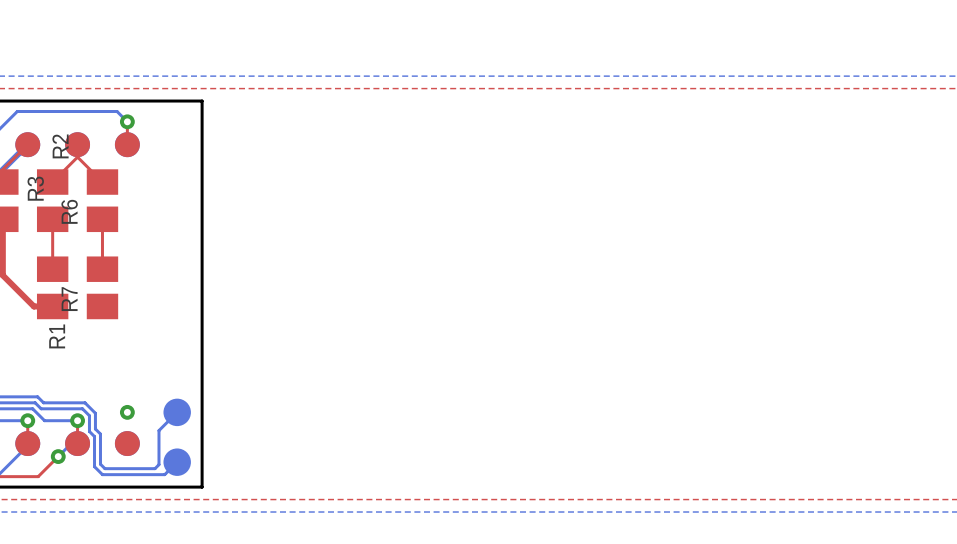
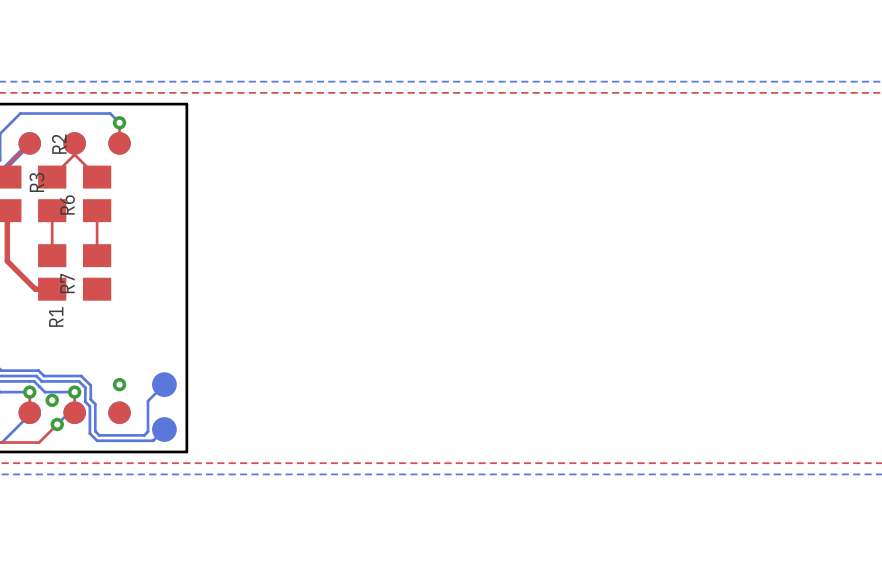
via: none -> (52, 400)

